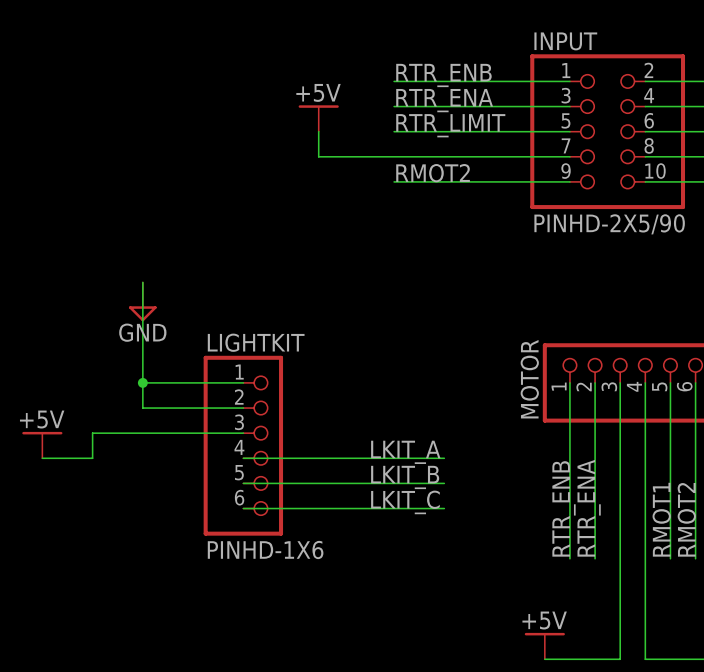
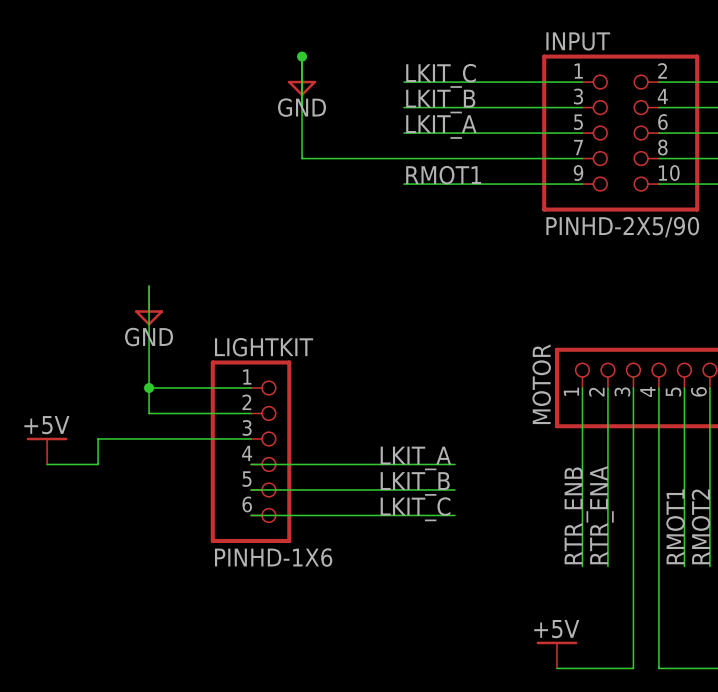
junction: none -> (302, 56)
power symbol: none -> GND (302, 76)
label: RTR_ENB (443, 75) -> LKIT_C (441, 75)
label: RTR_ENA (444, 100) -> LKIT_B (440, 101)
power symbol: +5V (318, 118) -> none
label: RTR_LIMIT (450, 125) -> LKIT_A (441, 127)
wire: (318, 131) (318, 156) -> (302, 56) (302, 158) (327, 158)
label: RMOT2 (433, 173) -> RMOT1 (443, 175)

